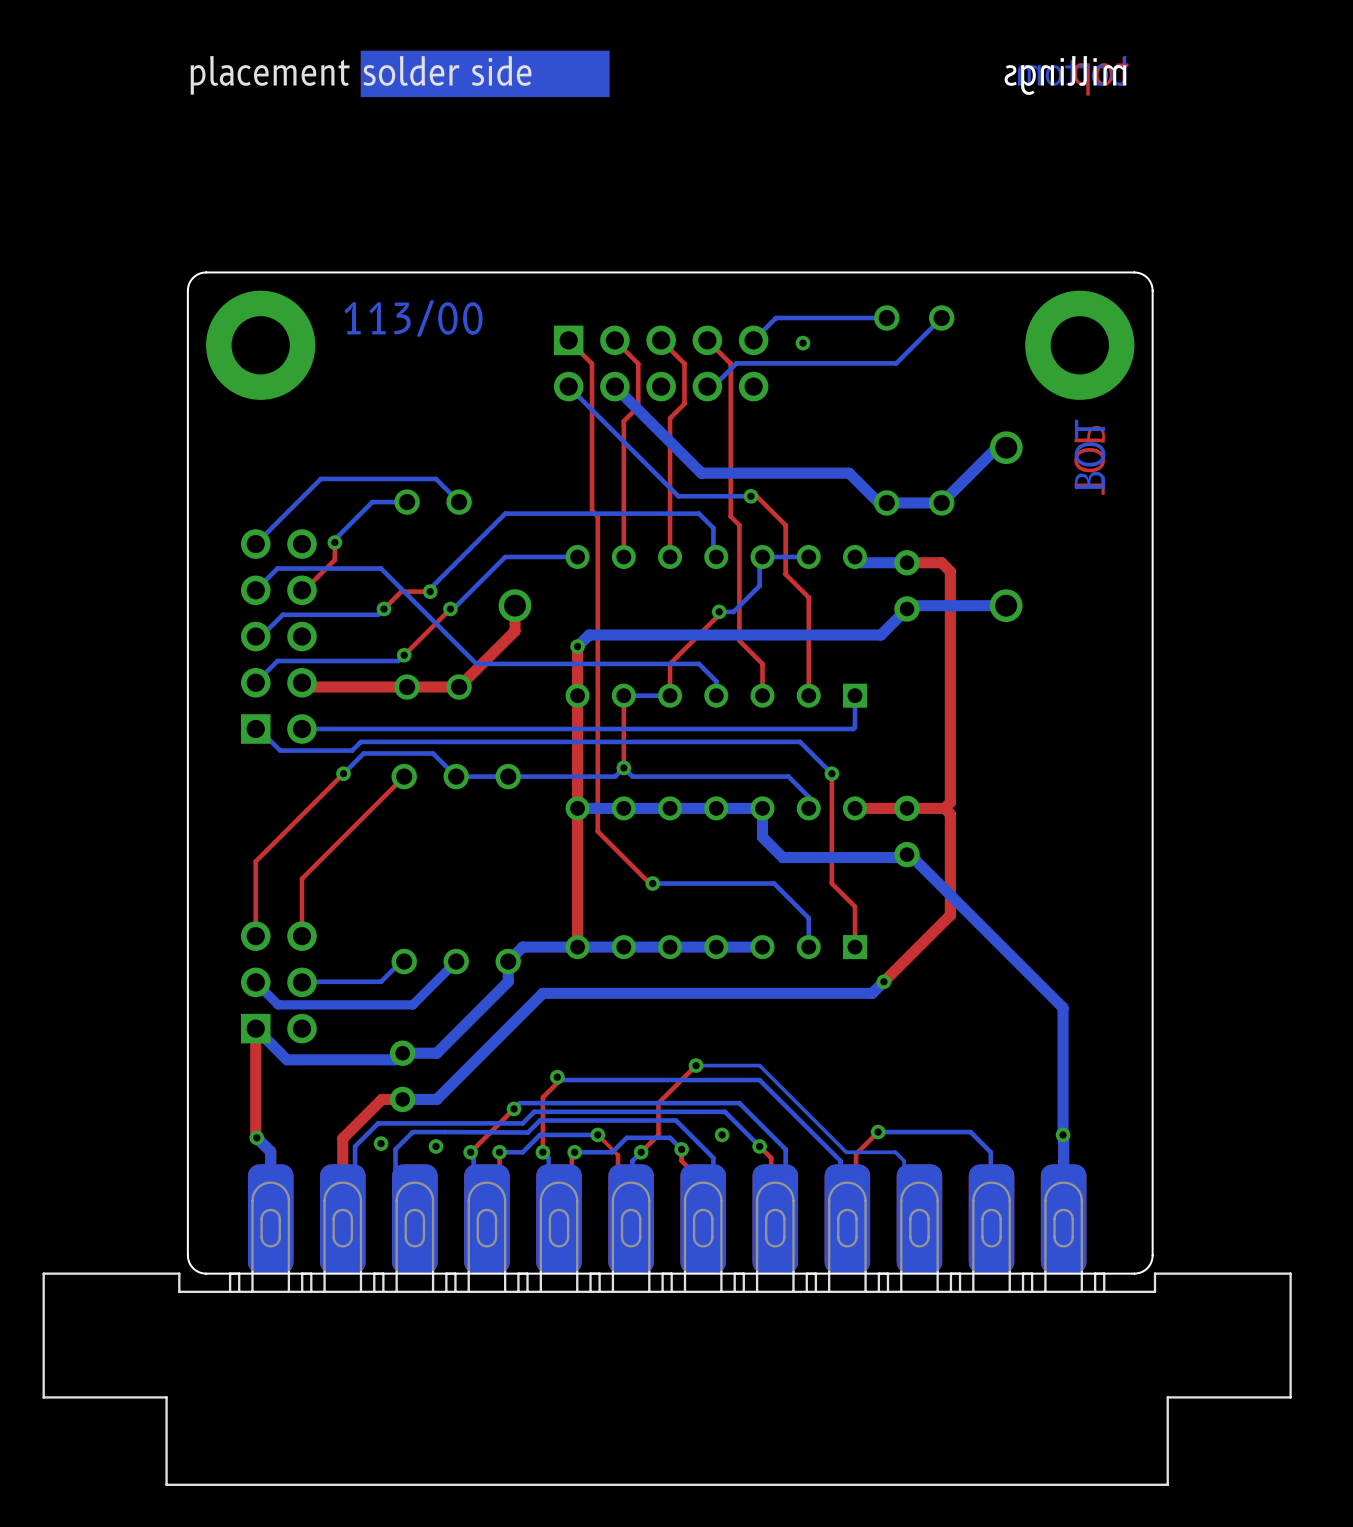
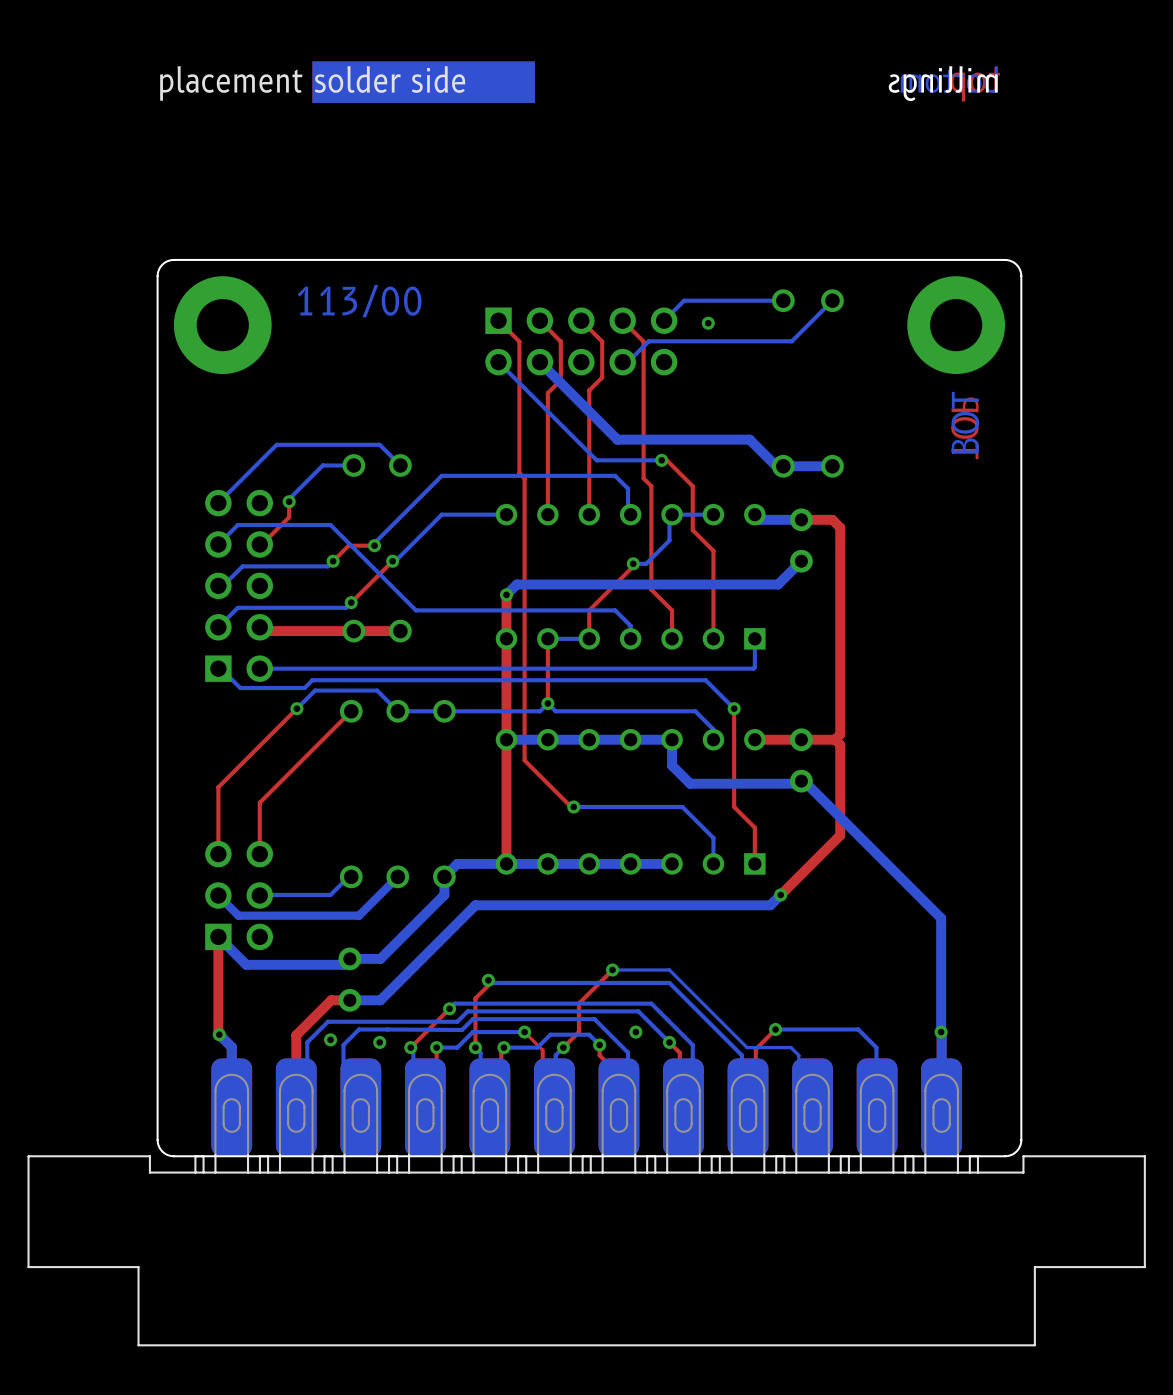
bottom track: (1006, 447) (996, 447) (941, 502) -> none
part: (1006, 447) -> none
top track: (515, 605) (515, 631) (459, 687) -> none
part: (515, 605) -> none
bottom track: (1006, 605) (910, 605) (907, 608) -> none
part: (1006, 605) -> none

